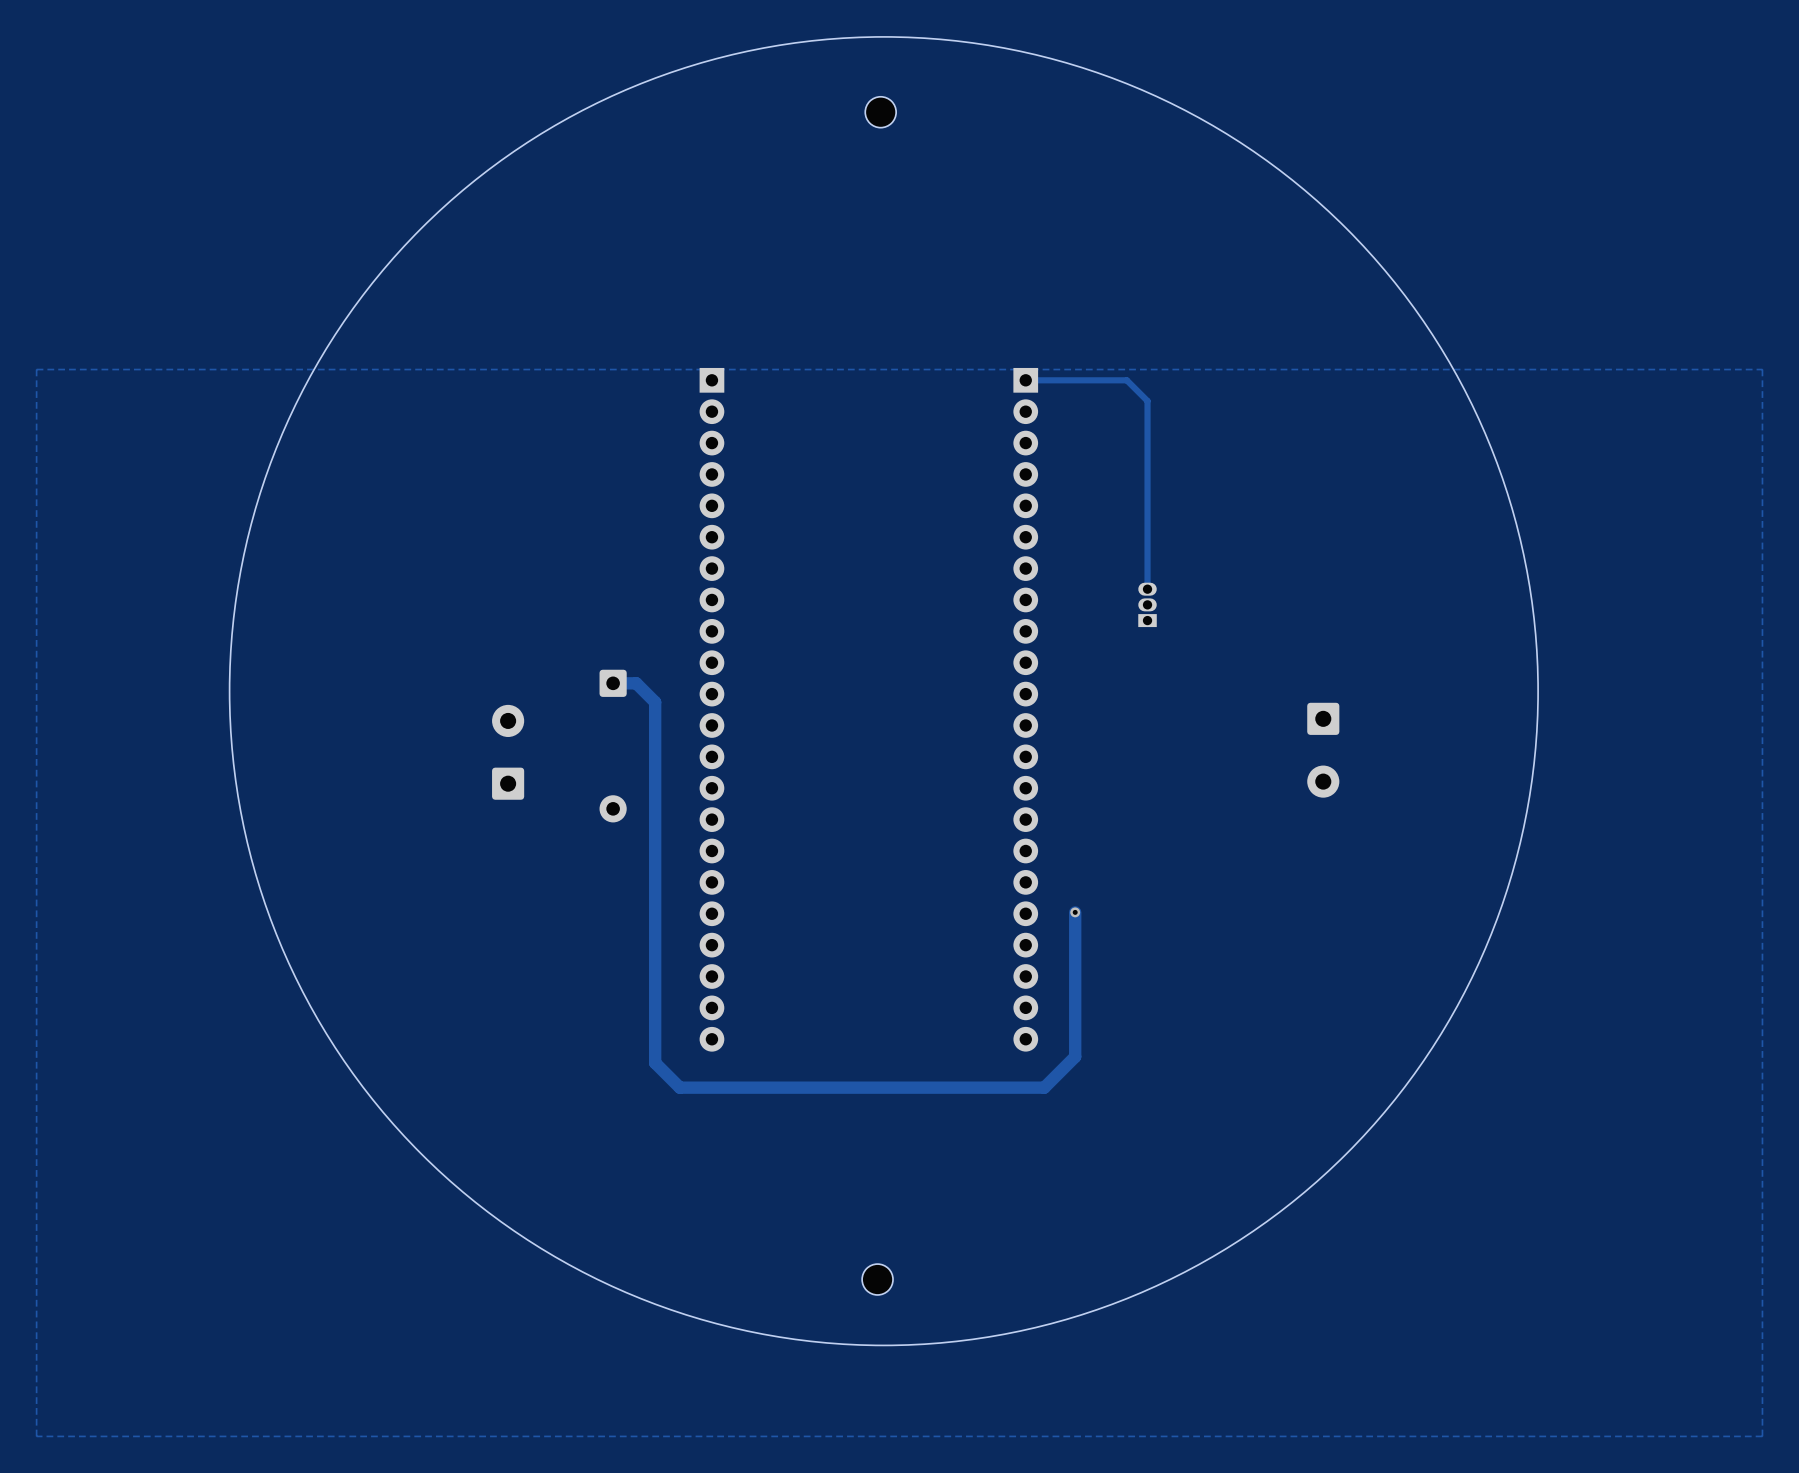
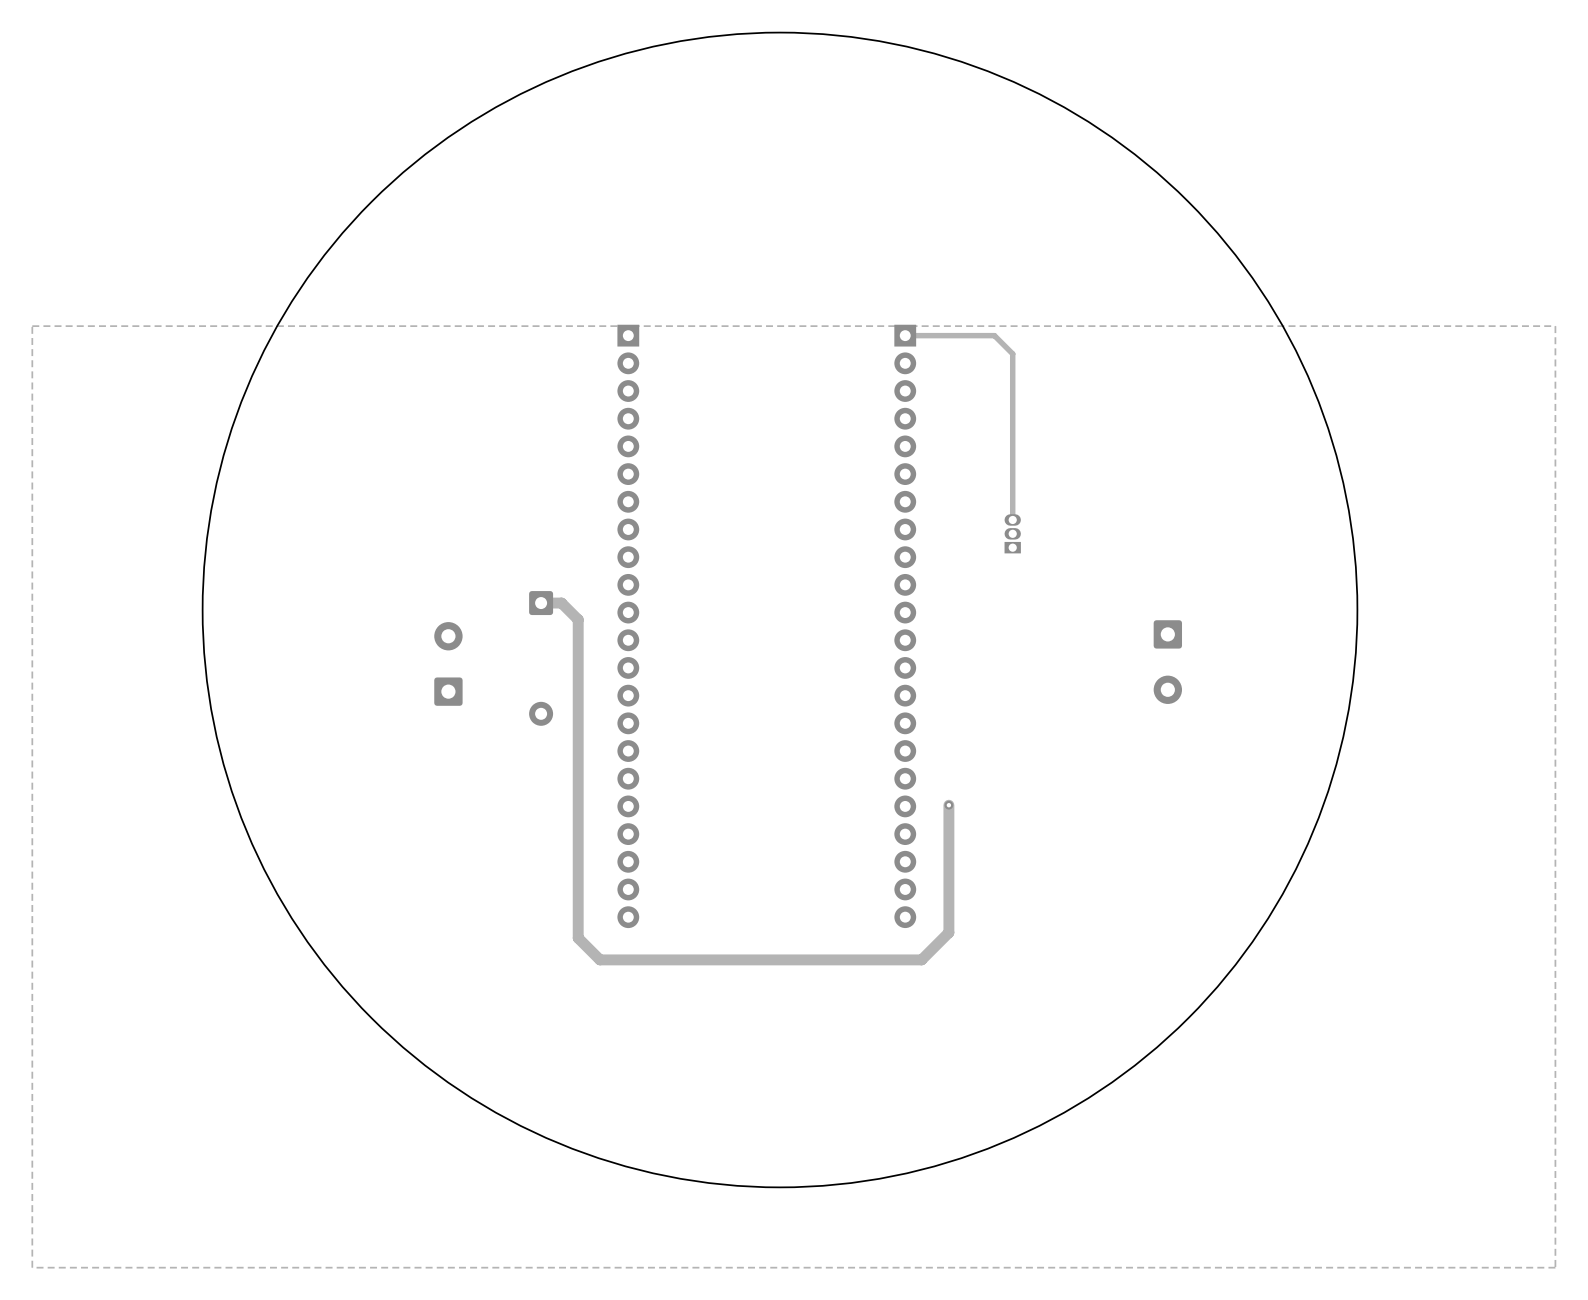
part: (880, 112) -> none
part: (877, 1279) -> none

